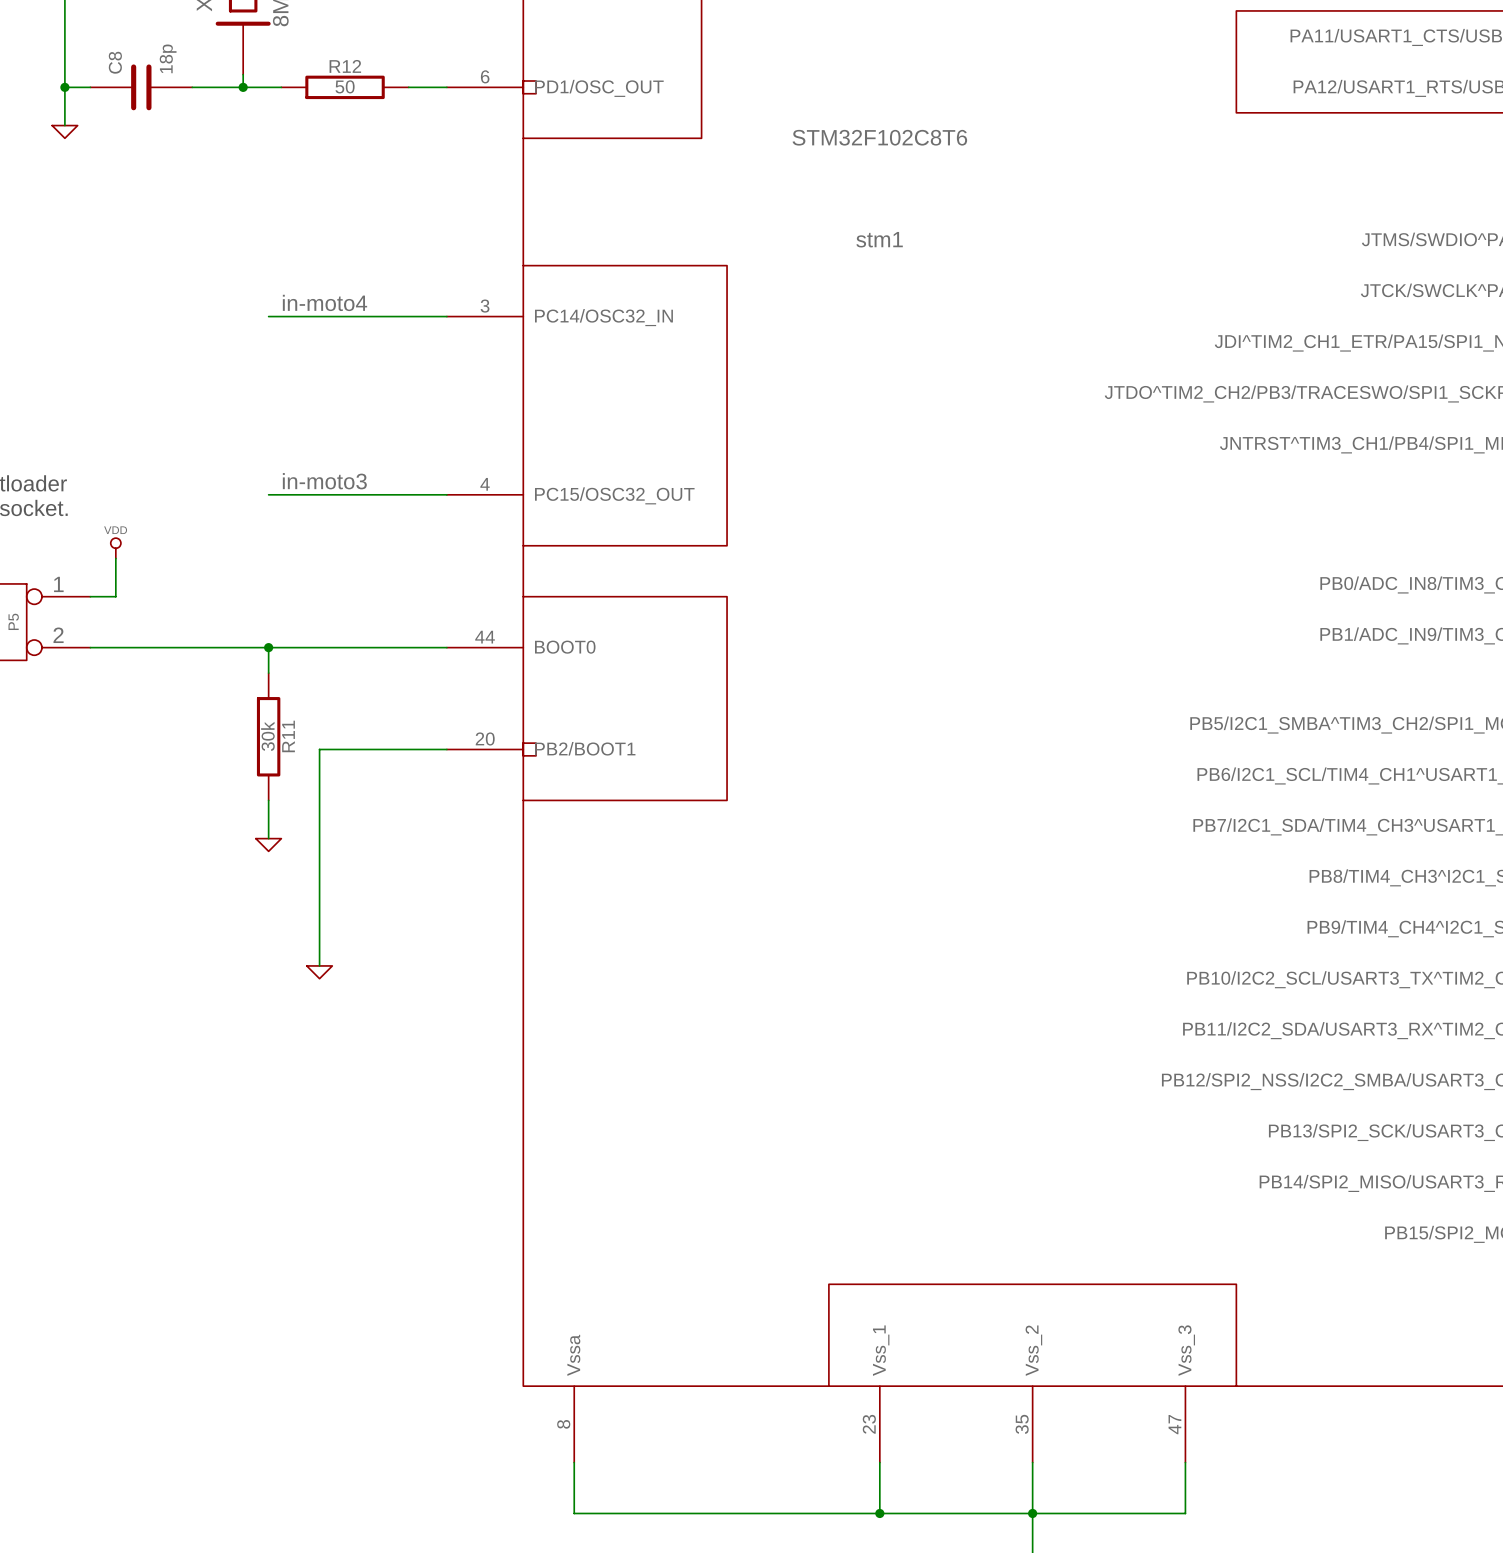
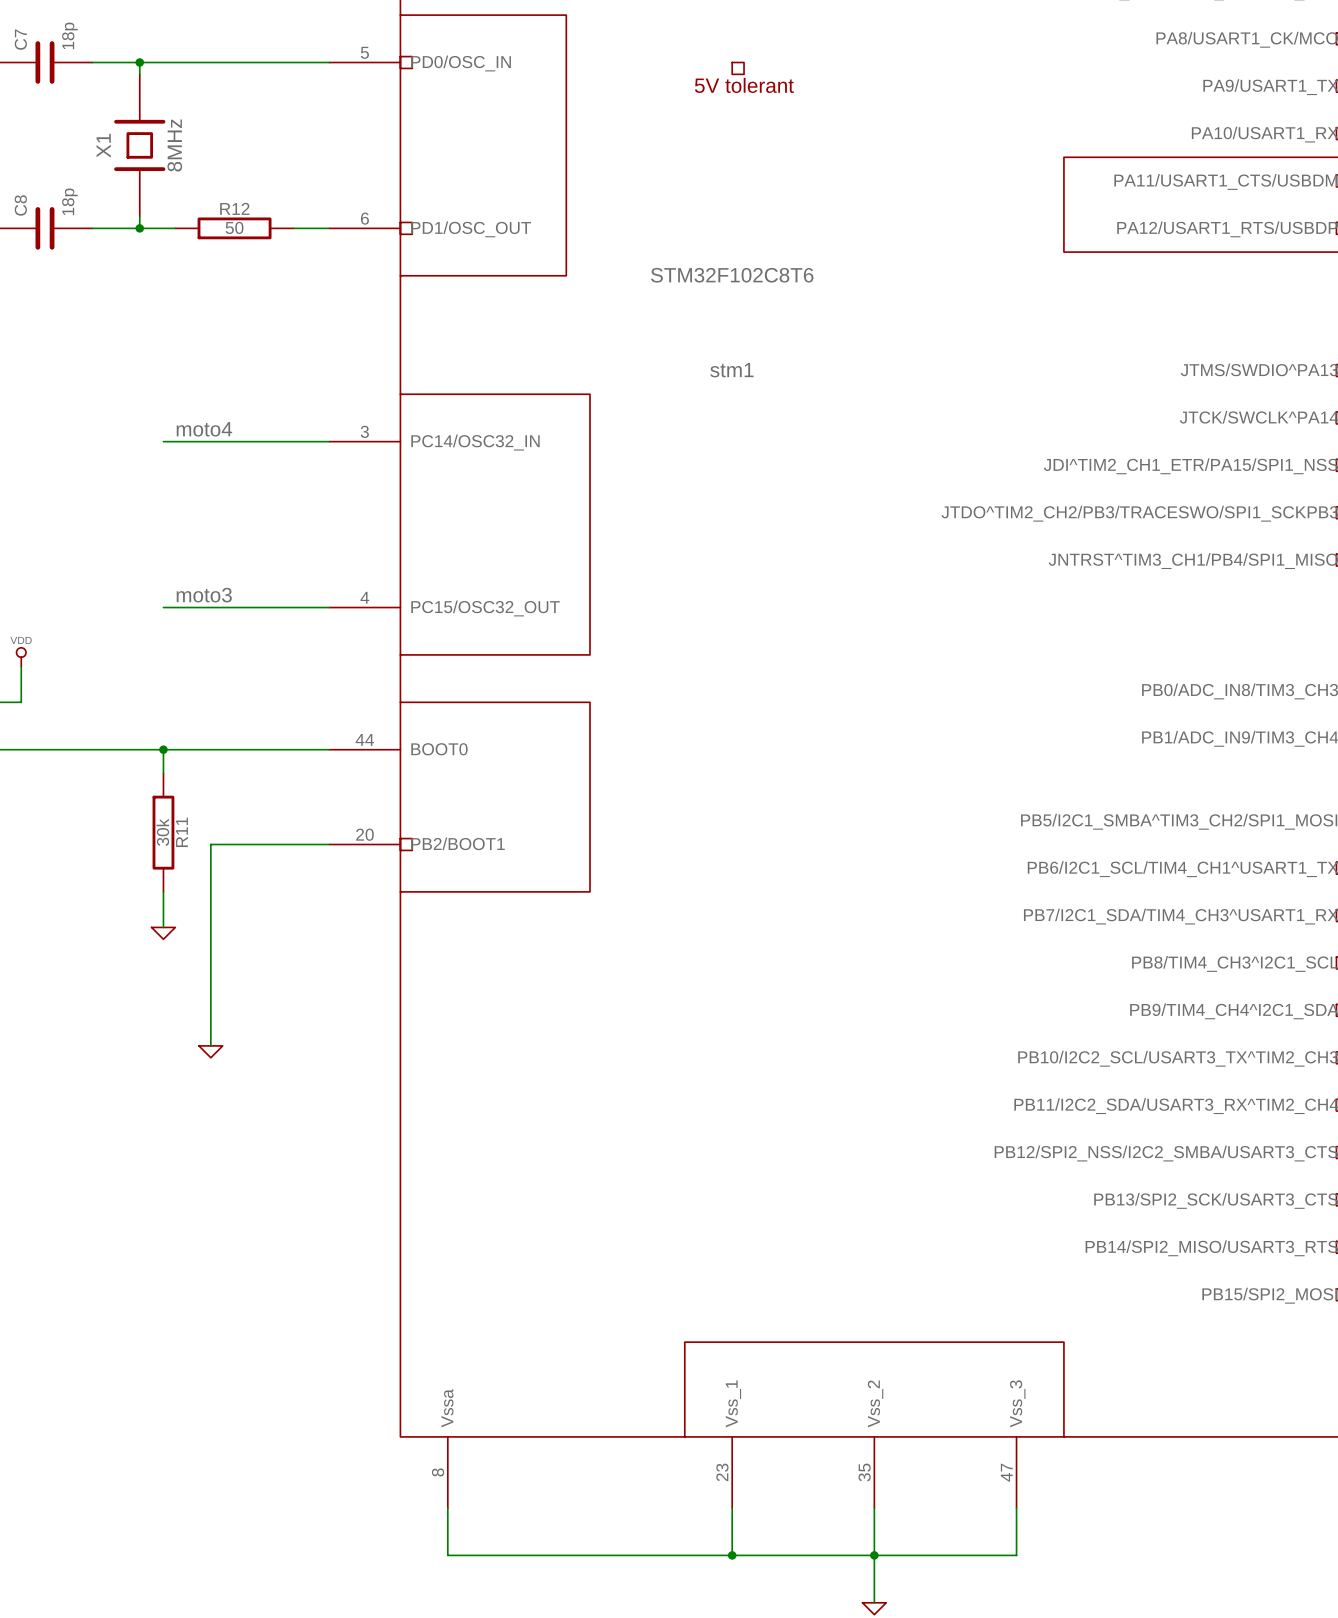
label: in-moto4 (324, 302) -> moto4 (204, 429)
label: in-moto3 (324, 481) -> moto3 (204, 595)

